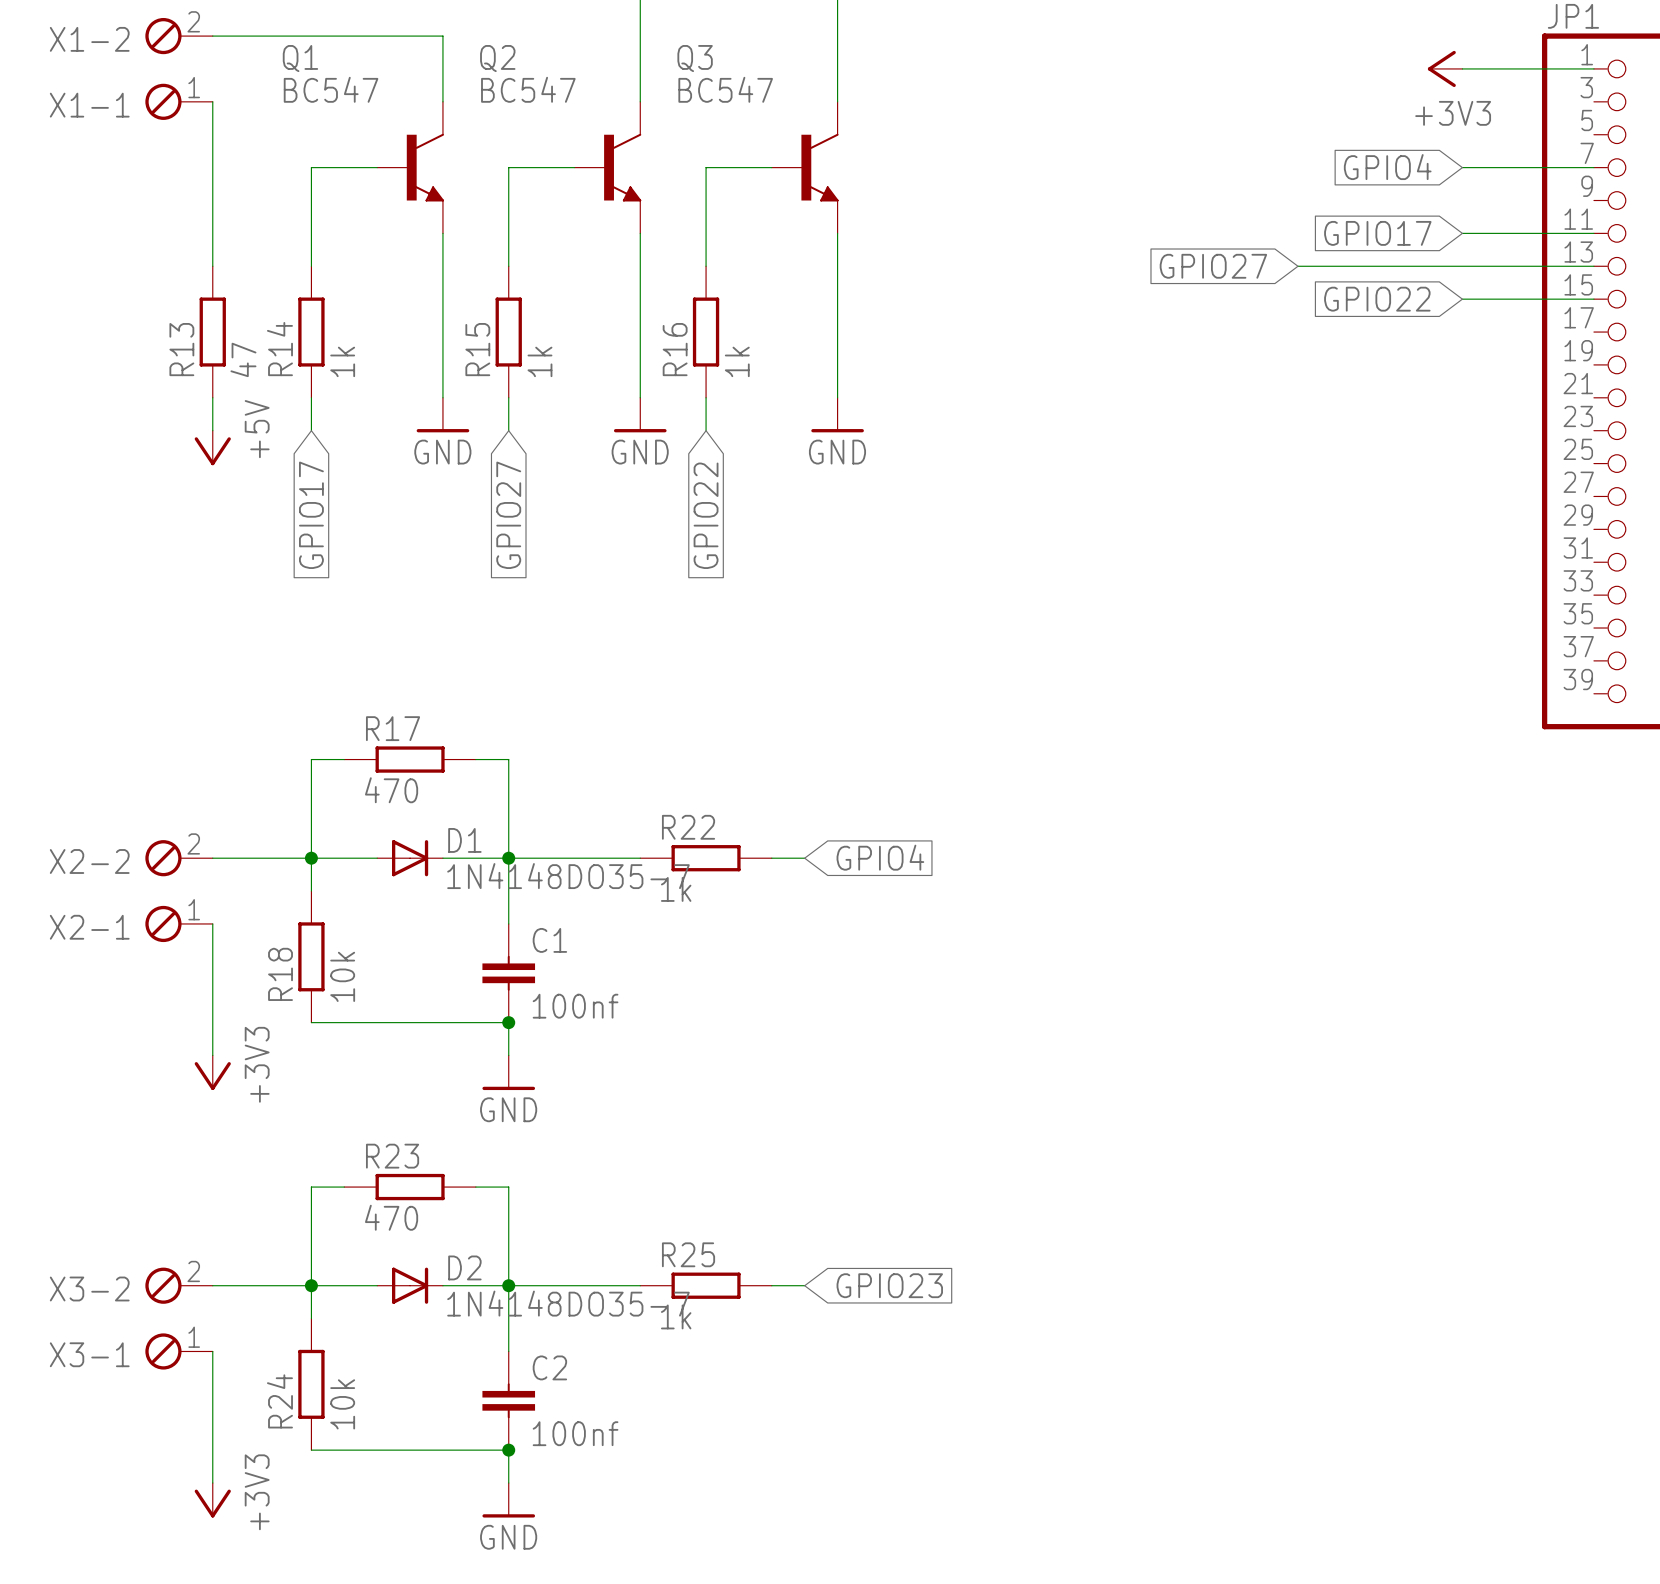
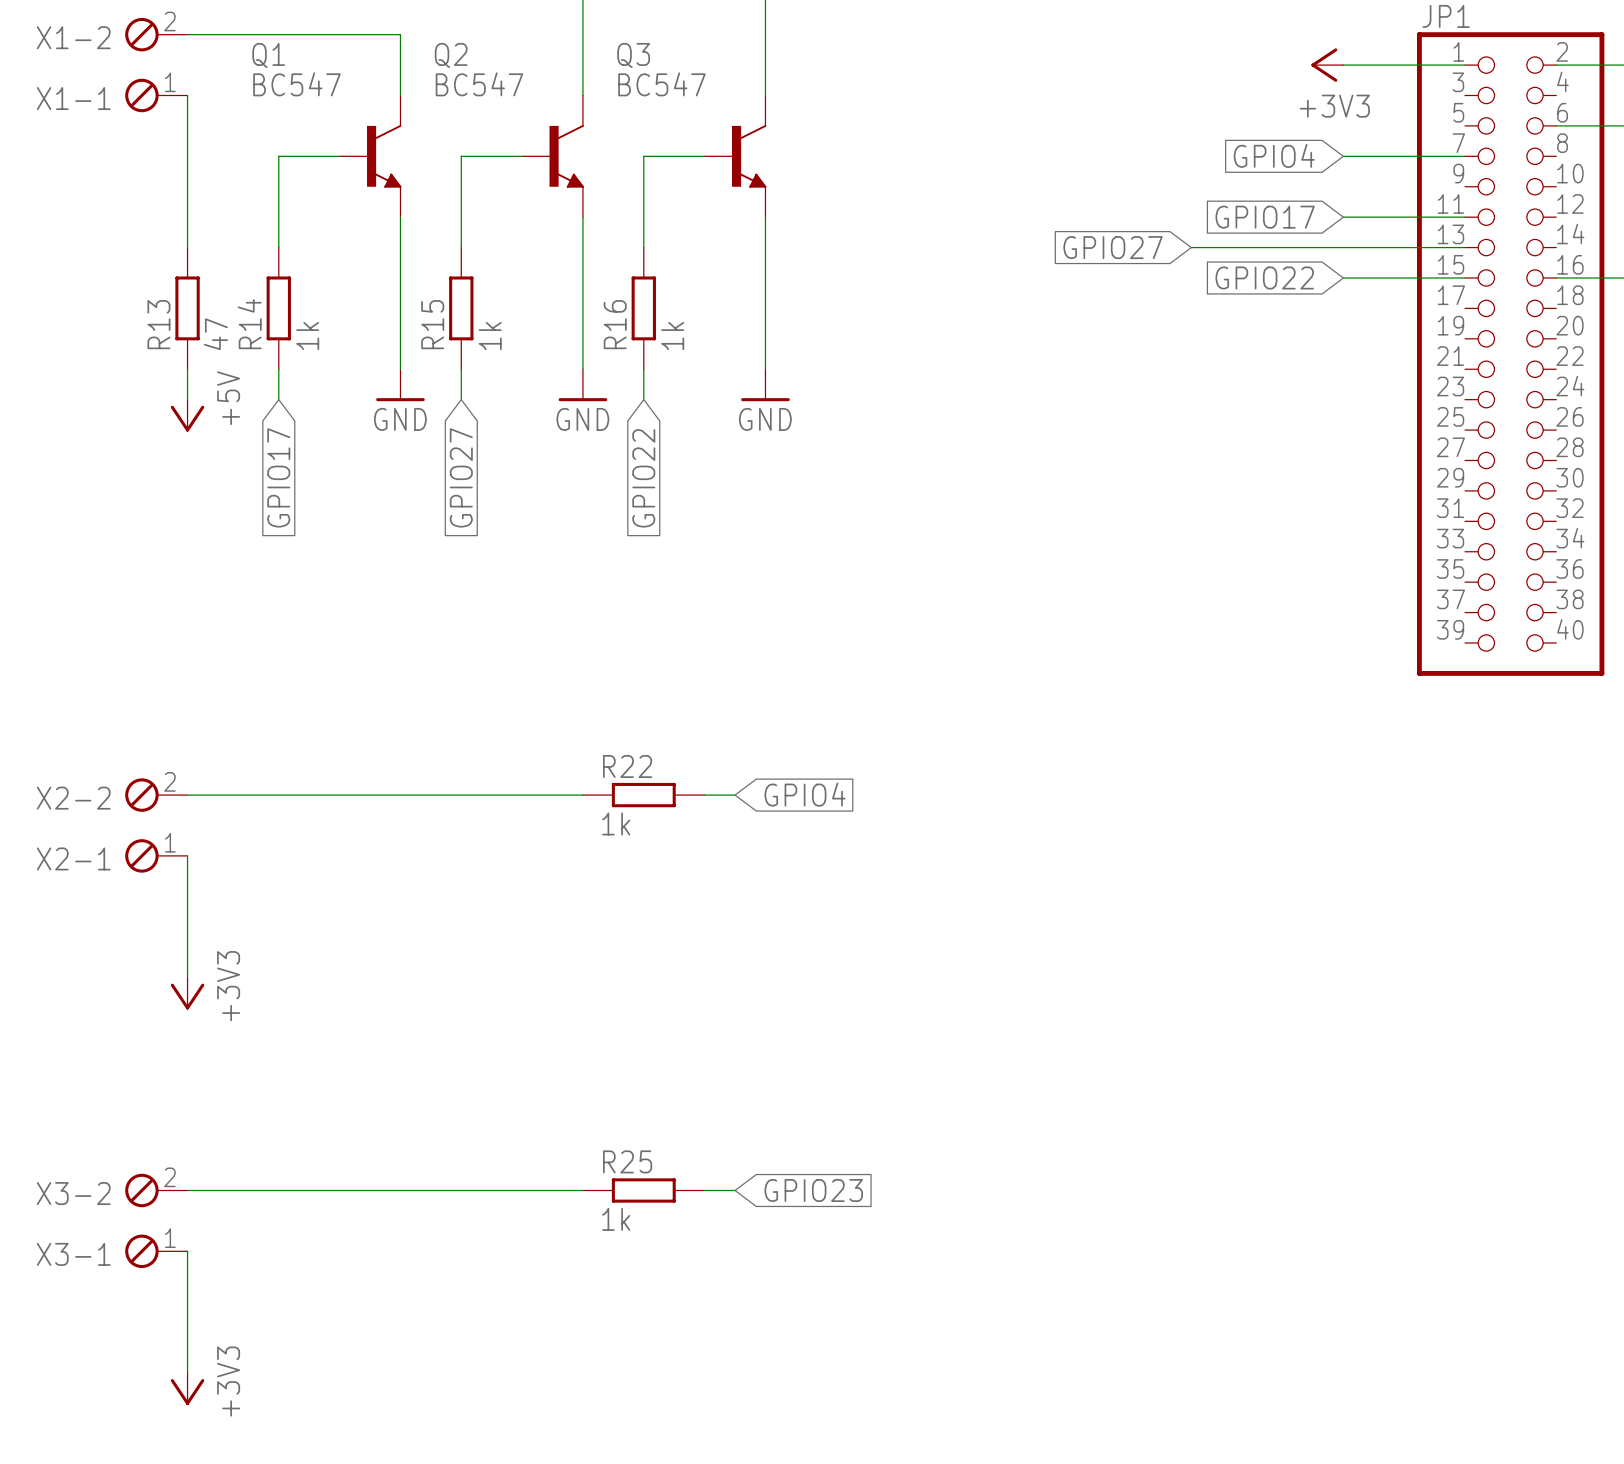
wire: (344, 759) (311, 759) (311, 891) -> none
R17: 470 (410, 759) -> none
wire: (475, 759) (508, 759) (508, 923) -> none
junction: (311, 858) -> none
D1: 1N4148DO35-7 (410, 858) -> none
junction: (508, 858) -> none
R18: 10k (311, 956) -> none
C1: 100nf (508, 973) -> none
wire: (311, 1022) (508, 1022) (508, 1055) -> none
junction: (508, 1022) -> none
power symbol: GND (508, 1072) -> none
wire: (344, 1187) (311, 1187) (311, 1318) -> none
R23: 470 (410, 1187) -> none
wire: (475, 1187) (508, 1187) (508, 1351) -> none
junction: (311, 1285) -> none
D2: 1N4148DO35-7 (410, 1285) -> none
junction: (508, 1285) -> none
R24: 10k (311, 1384) -> none
C2: 100nf (508, 1400) -> none
wire: (311, 1450) (508, 1450) (508, 1483) -> none
junction: (508, 1450) -> none
power symbol: GND (508, 1500) -> none

